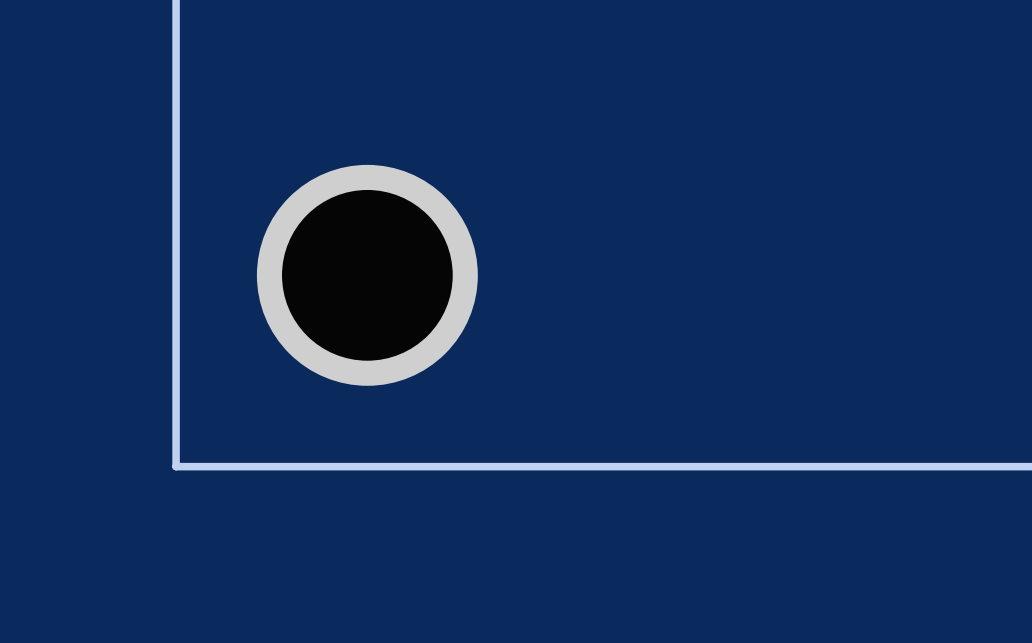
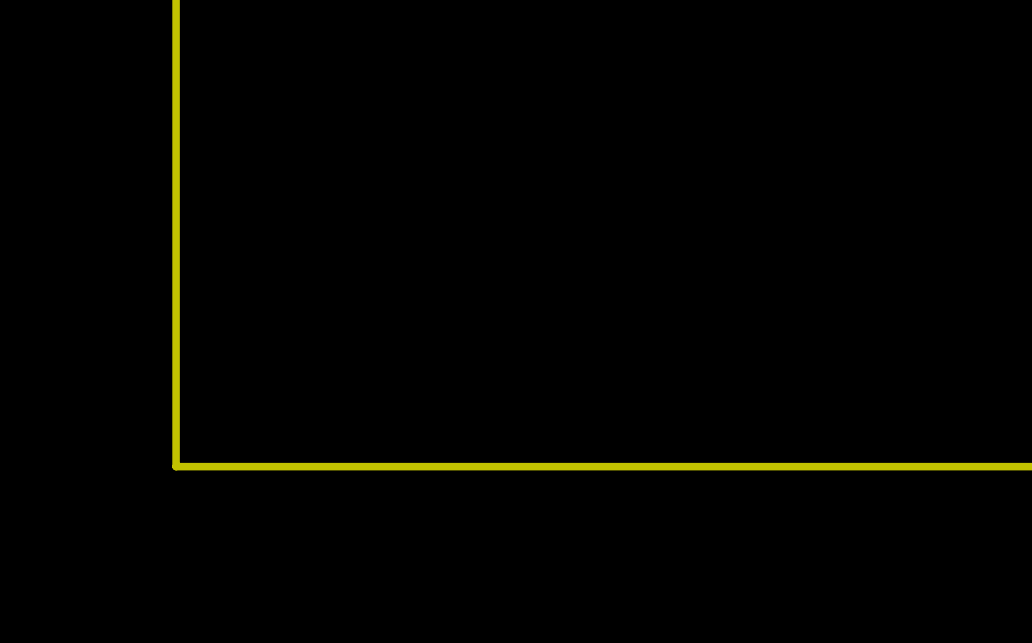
part: (367, 275) -> none

